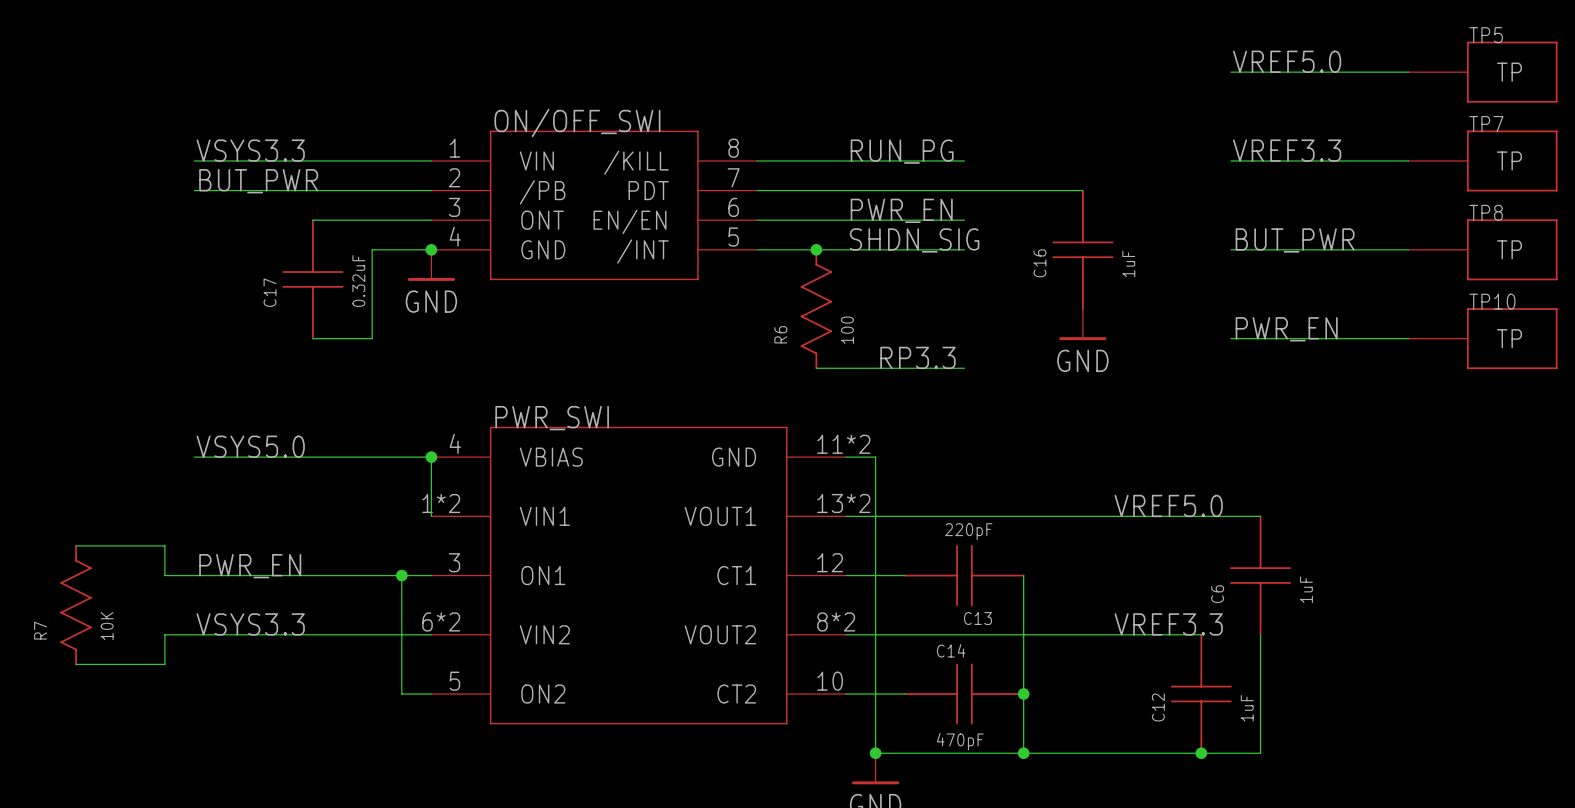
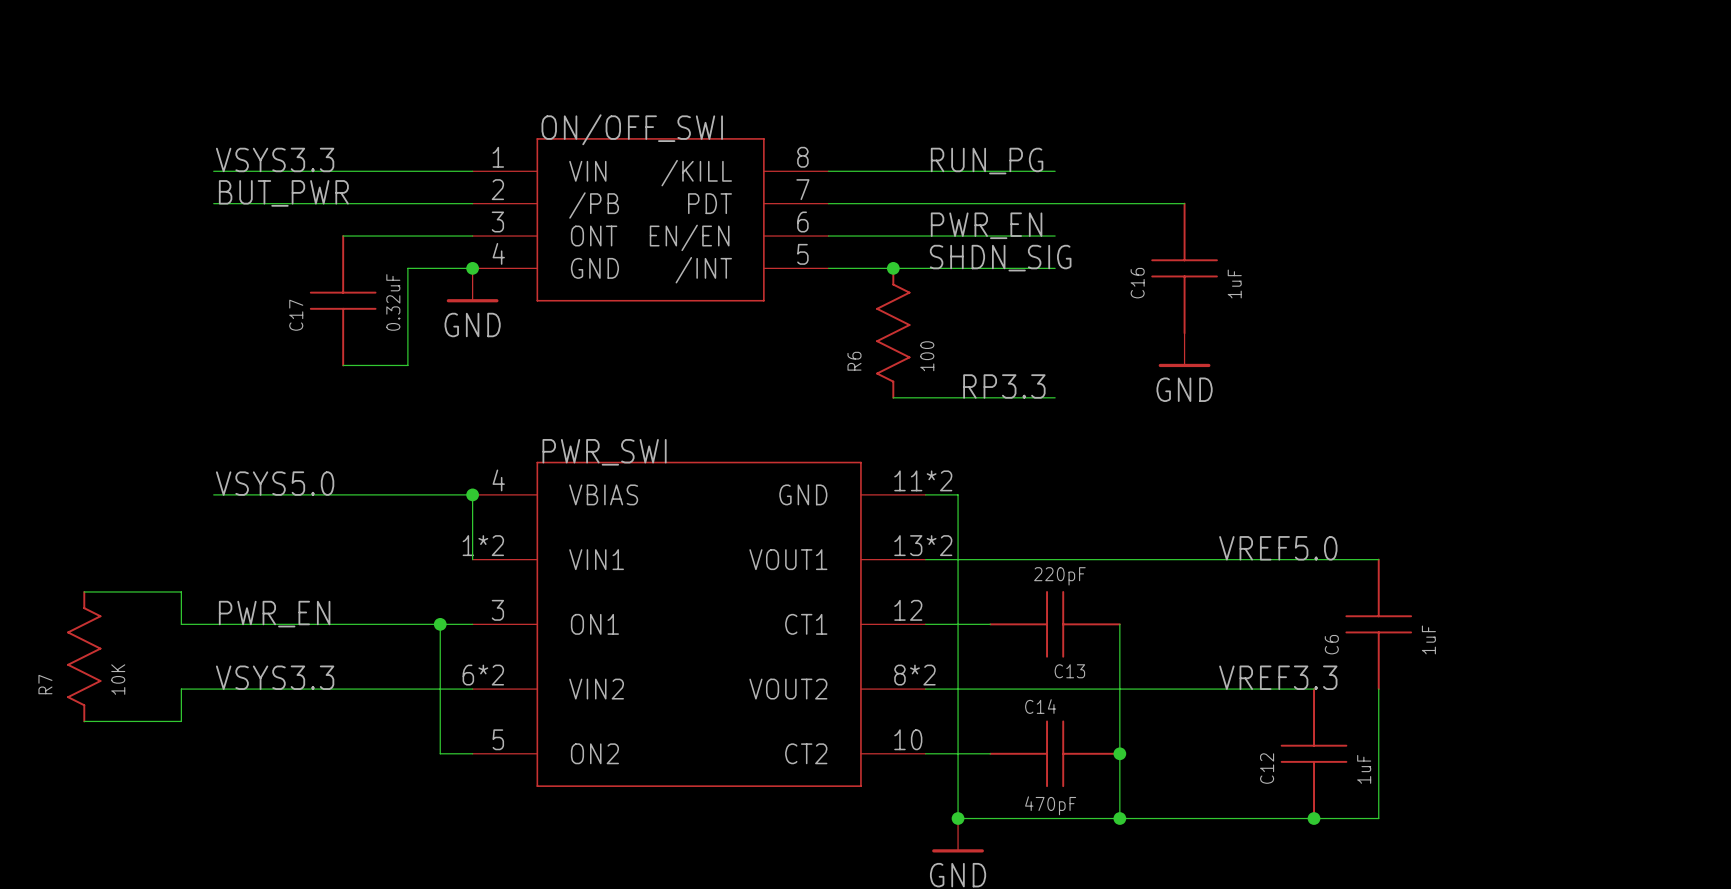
label: VREF5.0 (1287, 61) -> none
wire: (1230, 72) (1408, 72) -> none
TP5: (1483, 72) -> none
label: VREF3.3 (1287, 150) -> none
wire: (1230, 160) (1408, 160) -> none
TP7: (1483, 160) -> none
label: BUT_PWR (1295, 240) -> none
wire: (1230, 249) (1408, 249) -> none
TP8: (1483, 249) -> none
label: PWR_EN (1286, 329) -> none
wire: (1230, 338) (1408, 338) -> none
TP10: (1483, 338) -> none

